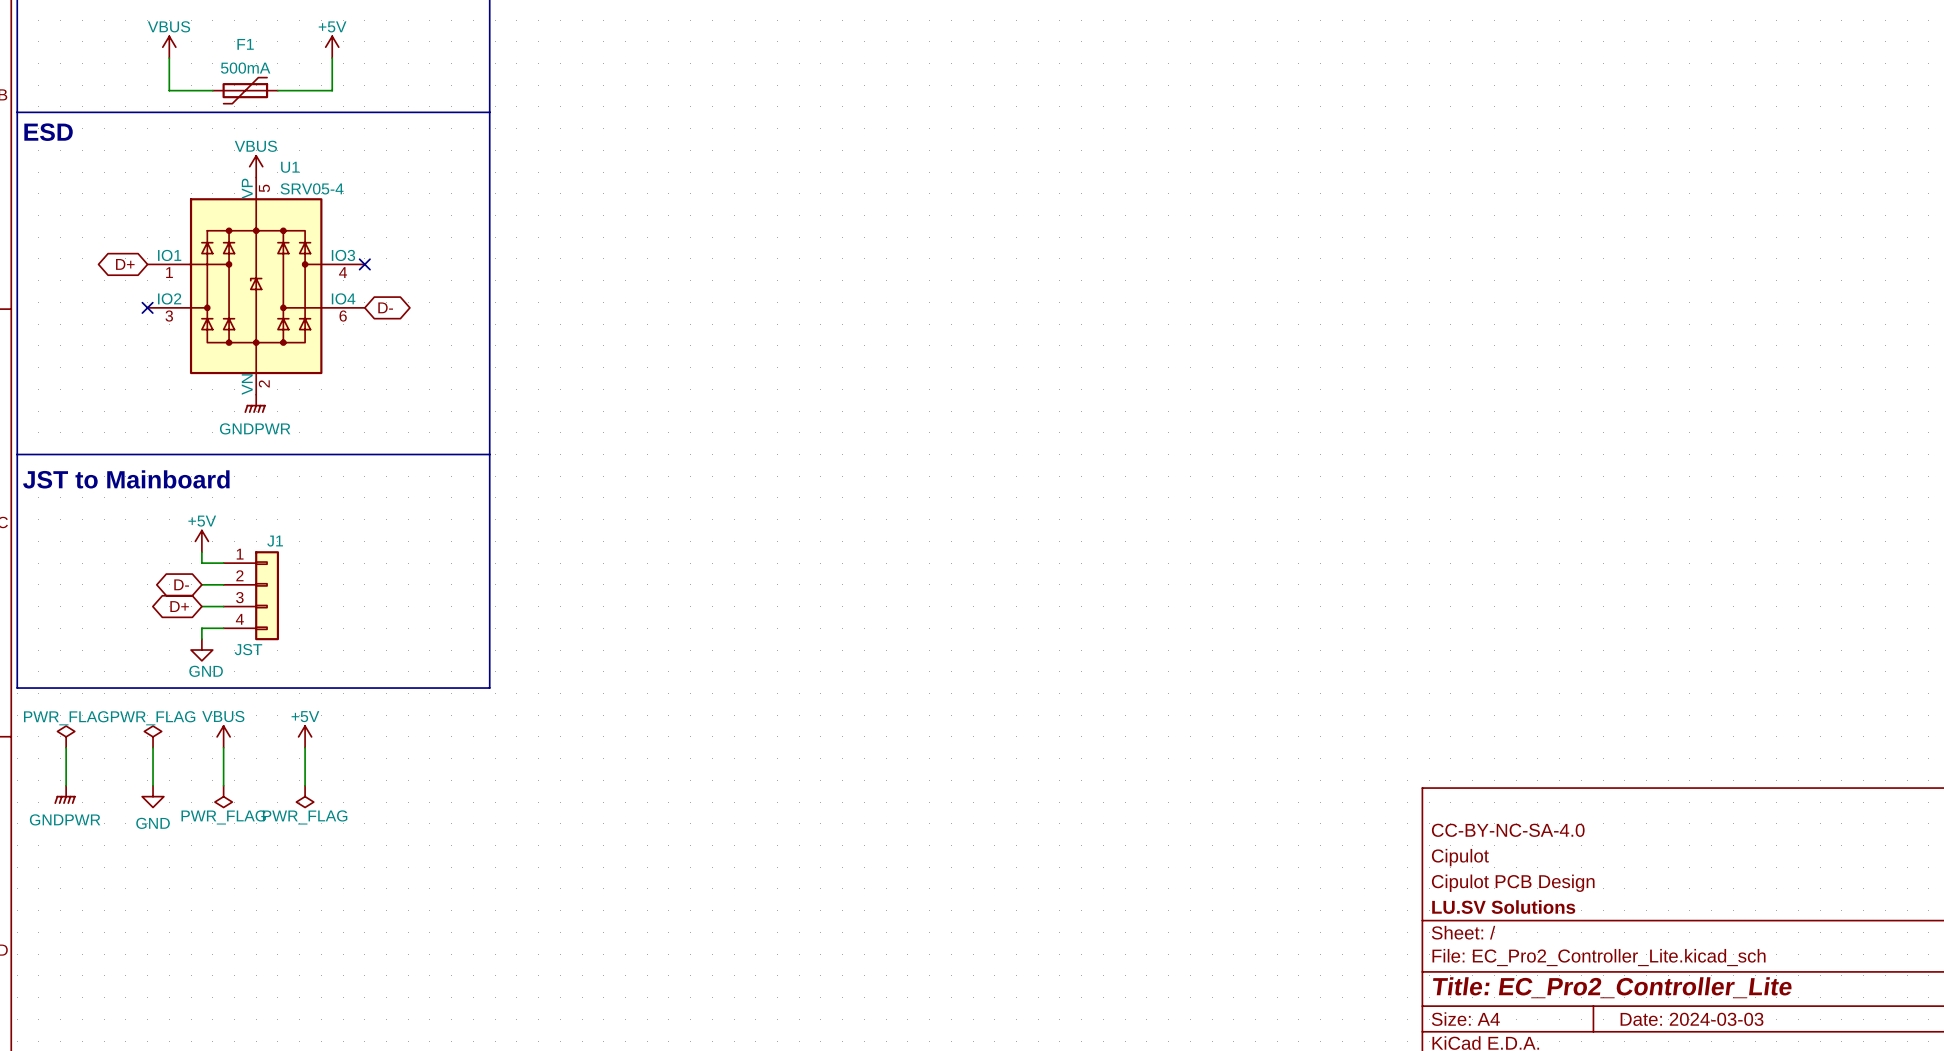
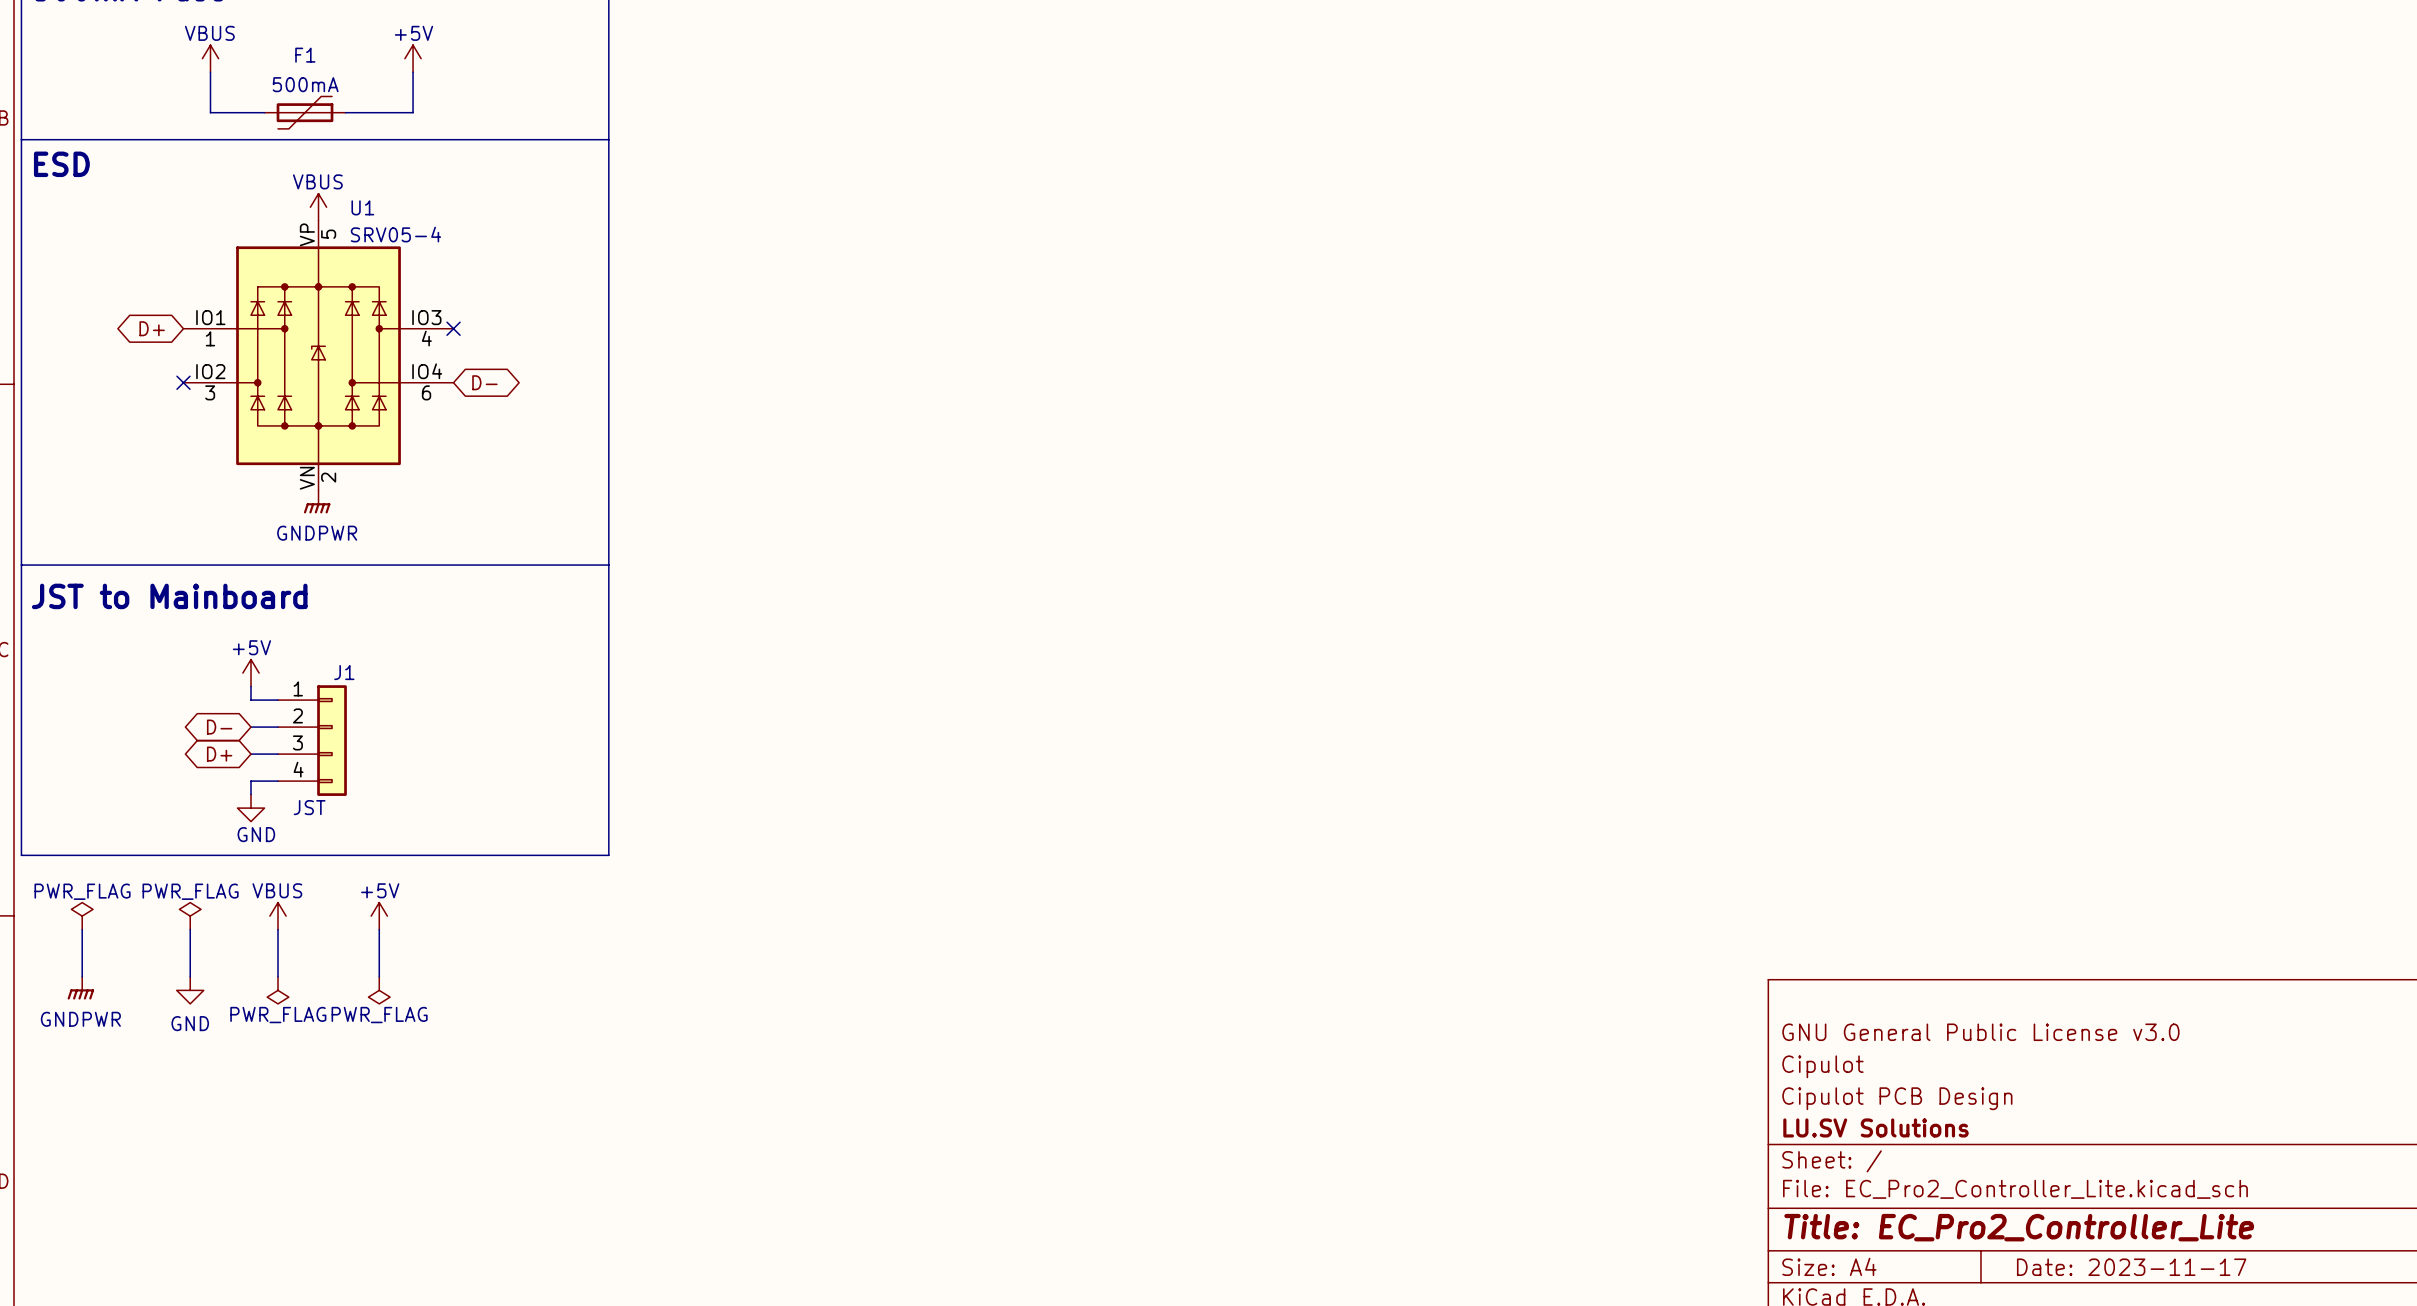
title block: CC-BY-NC-SA-4.0 (1508, 830) -> GNU General Public License v3.0 (1980, 1032)
title block: Date: 2024-03-03 (1692, 1019) -> Date: 2023-11-17 (2131, 1267)

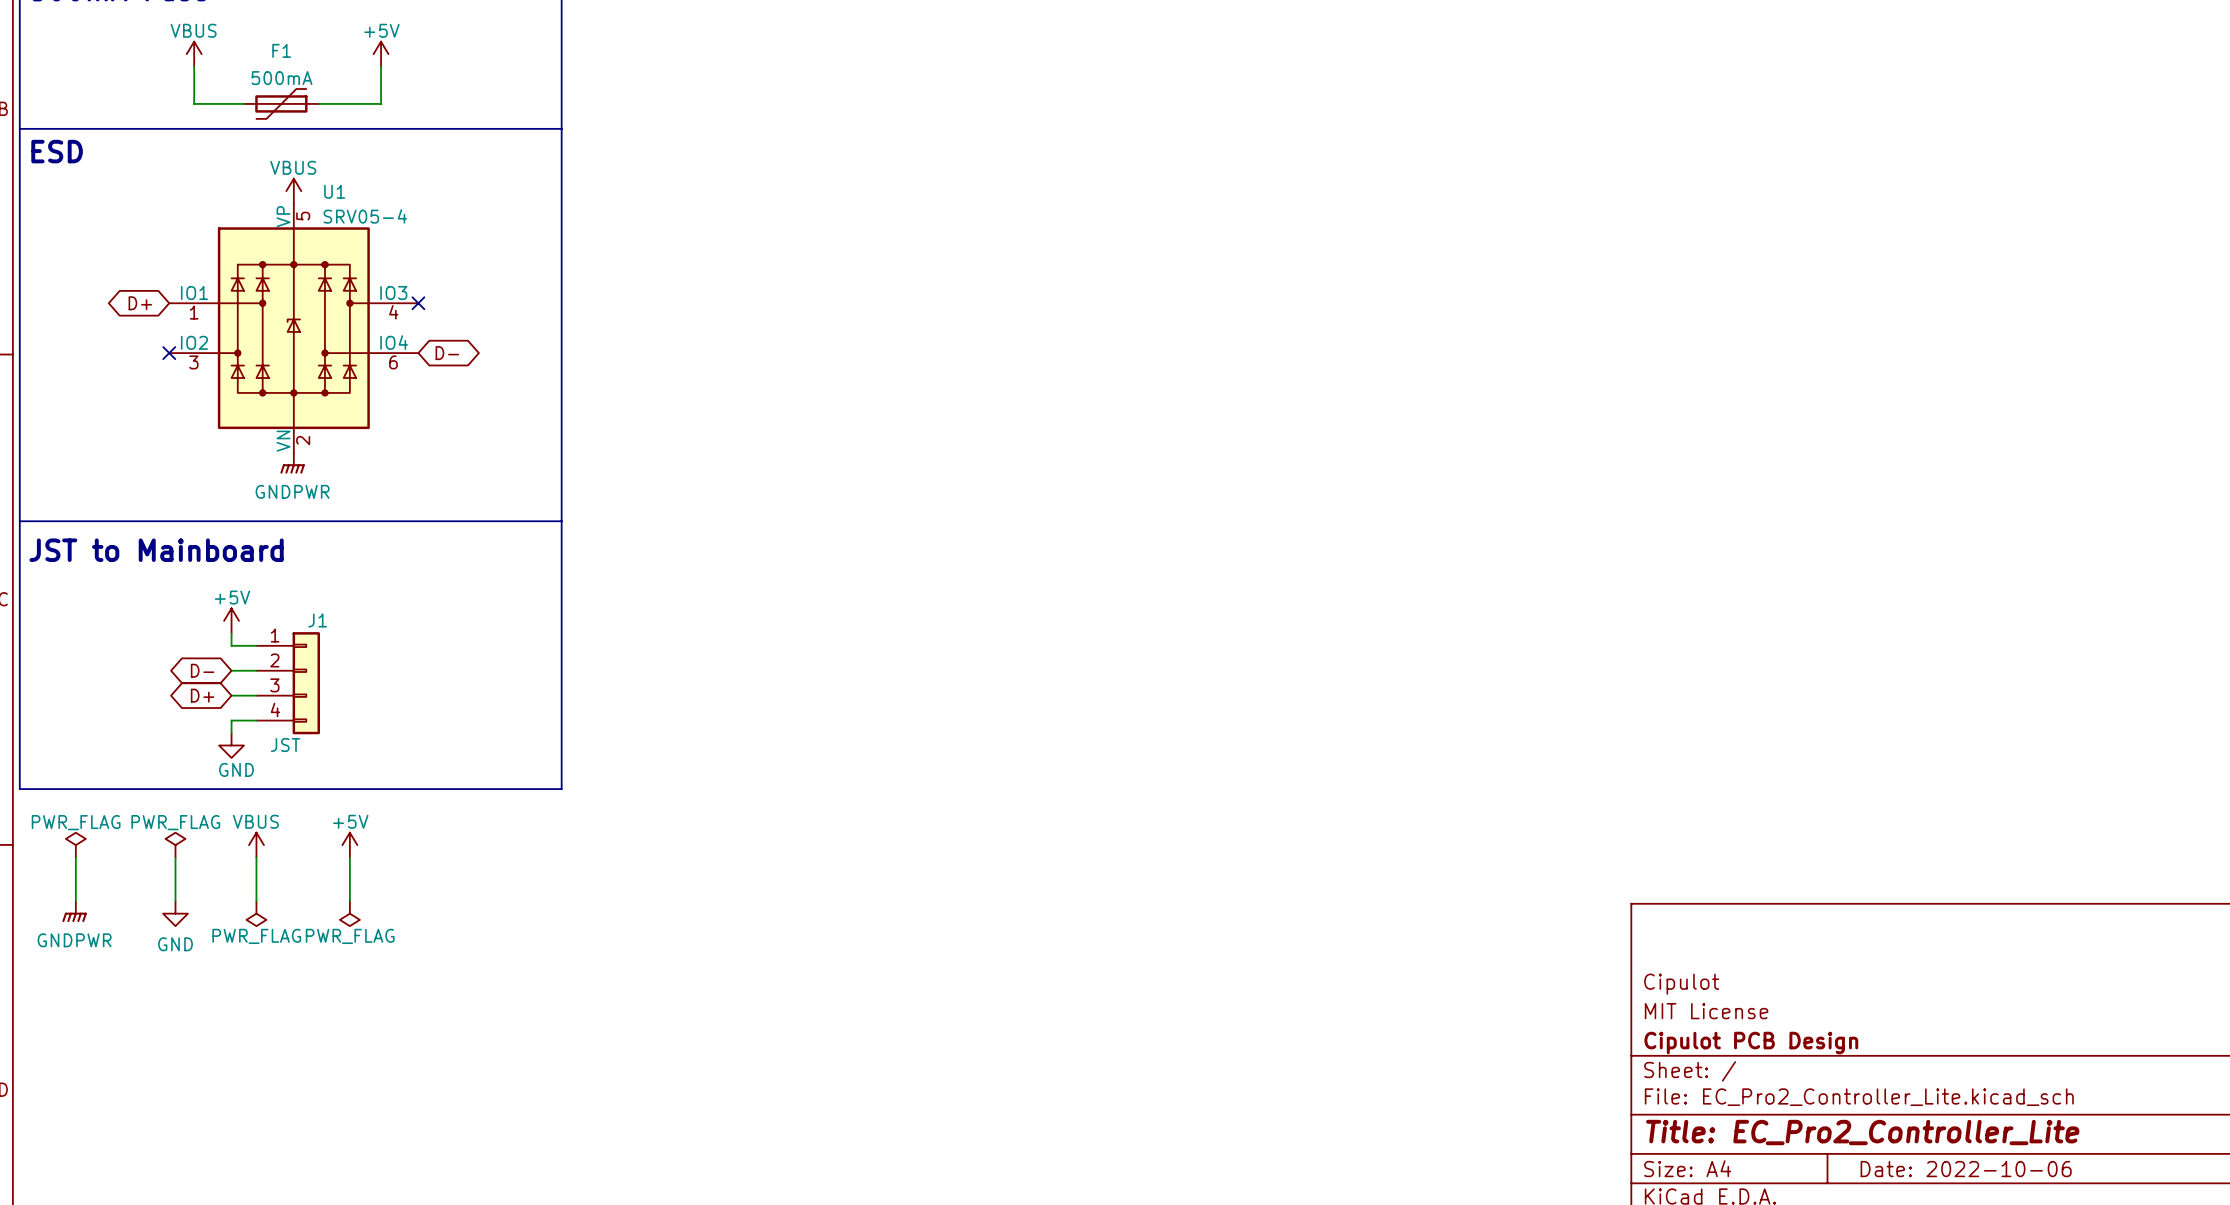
title block: GNU General Public License v3.0 (1980, 1032) -> none
title block: Cipulot PCB Design (1897, 1098) -> MIT License (1706, 1011)
title block: LU.SV Solutions (1875, 1127) -> Cipulot PCB Design (1751, 1043)
title block: Date: 2023-11-17 (2131, 1267) -> Date: 2022-10-06 (1966, 1169)

